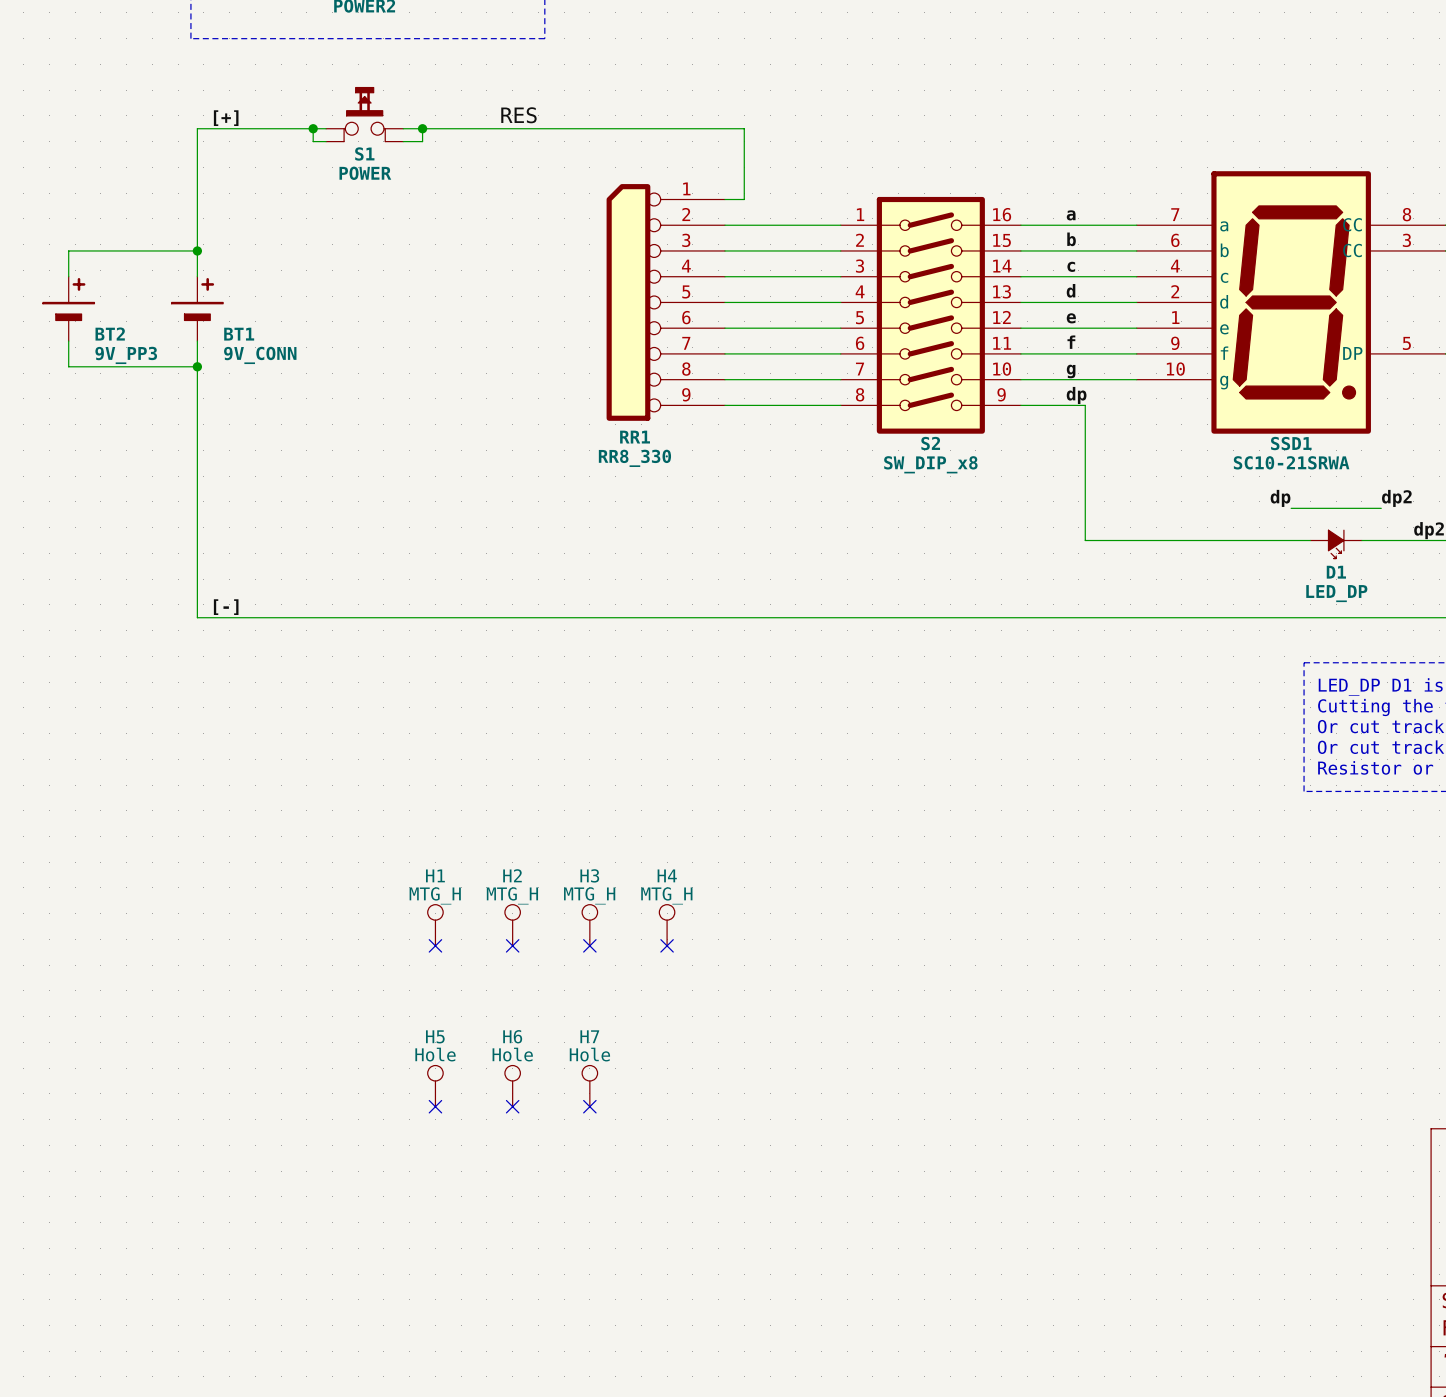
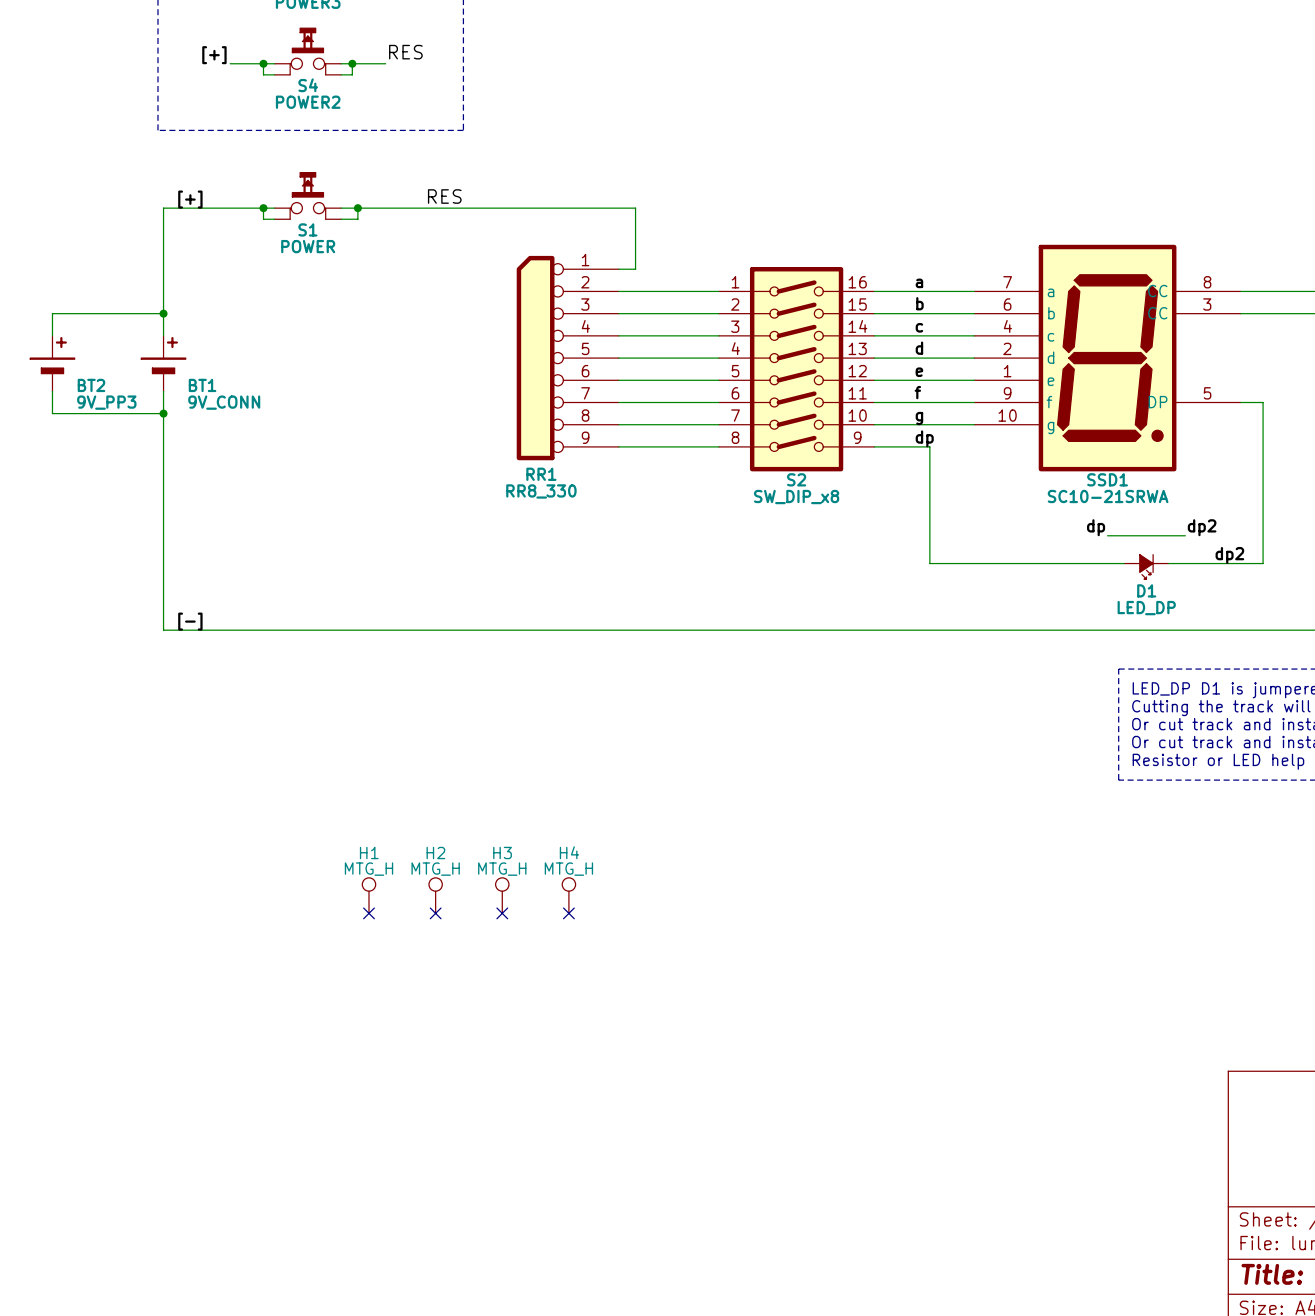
H5: Hole (435, 1086) -> none
H6: Hole (512, 1086) -> none
H7: Hole (589, 1086) -> none
no-connect mark: (435, 1106) -> none
no-connect mark: (512, 1106) -> none
no-connect mark: (589, 1106) -> none

